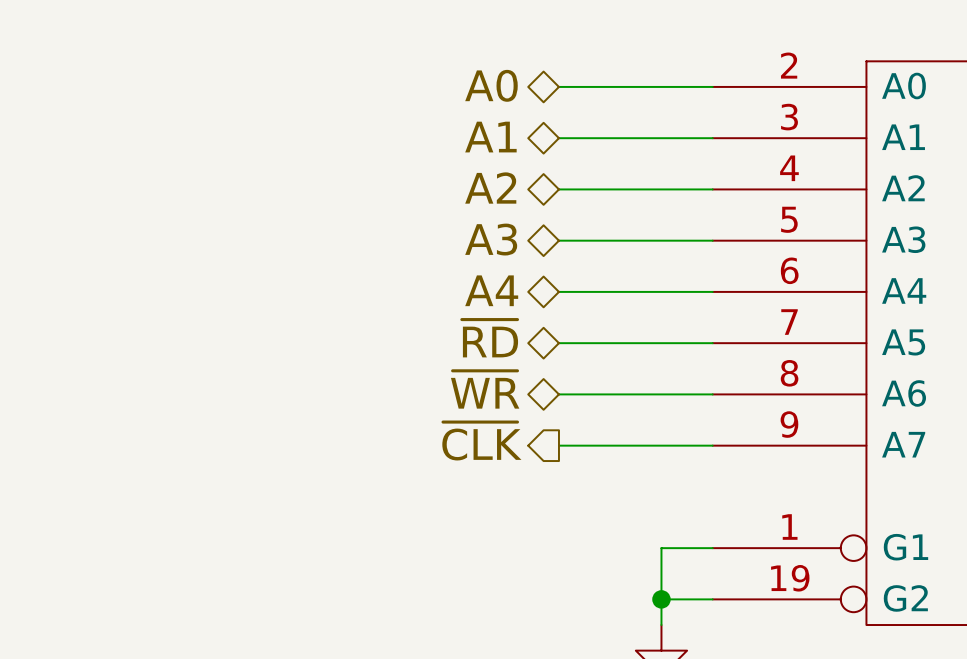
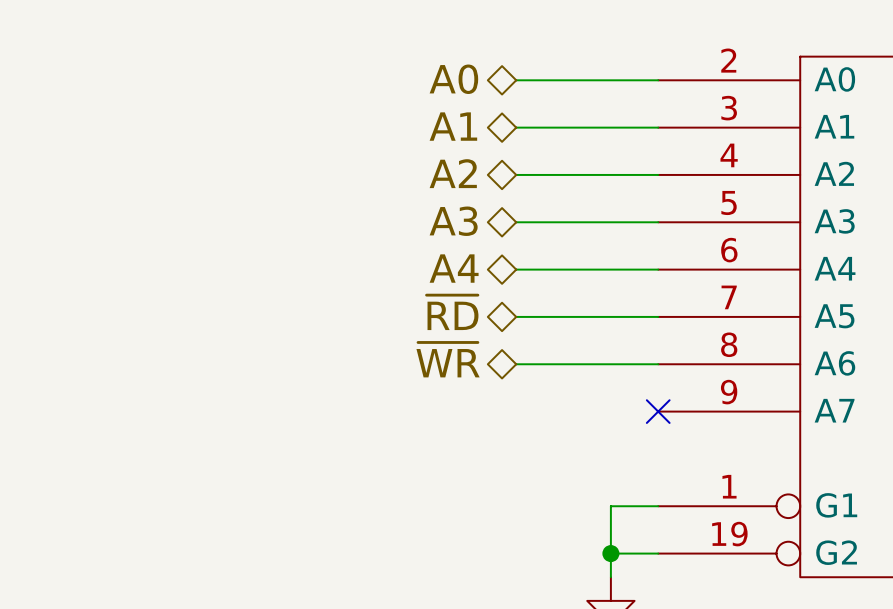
hierarchical label: ~{CLK} (481, 441) -> none
wire: (558, 445) (712, 445) -> none
no-connect mark: none -> (658, 411)

